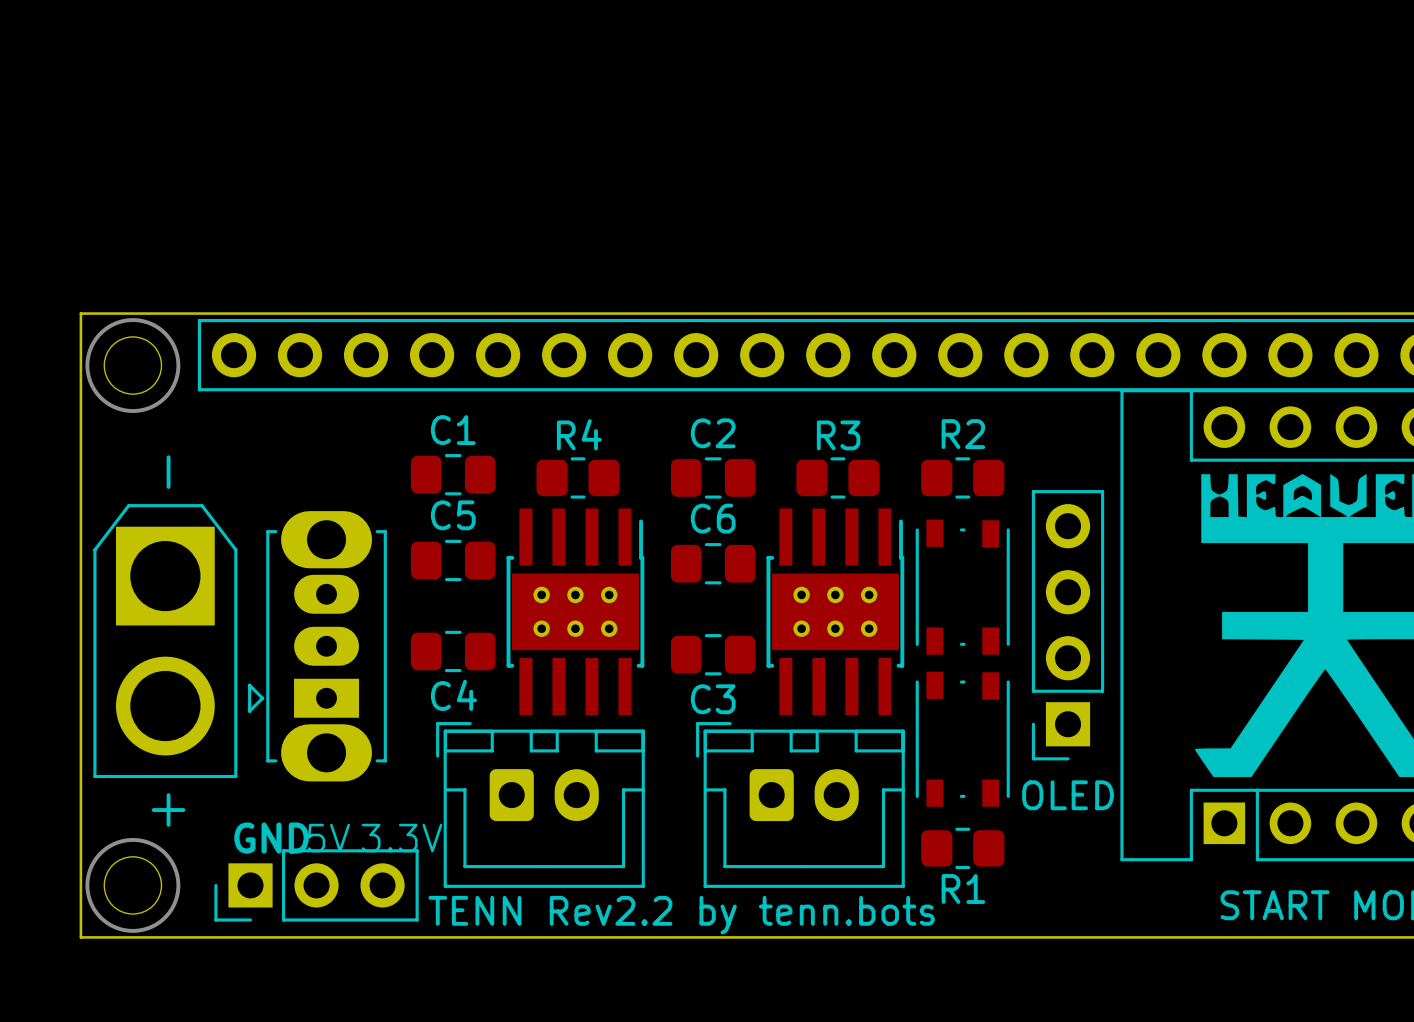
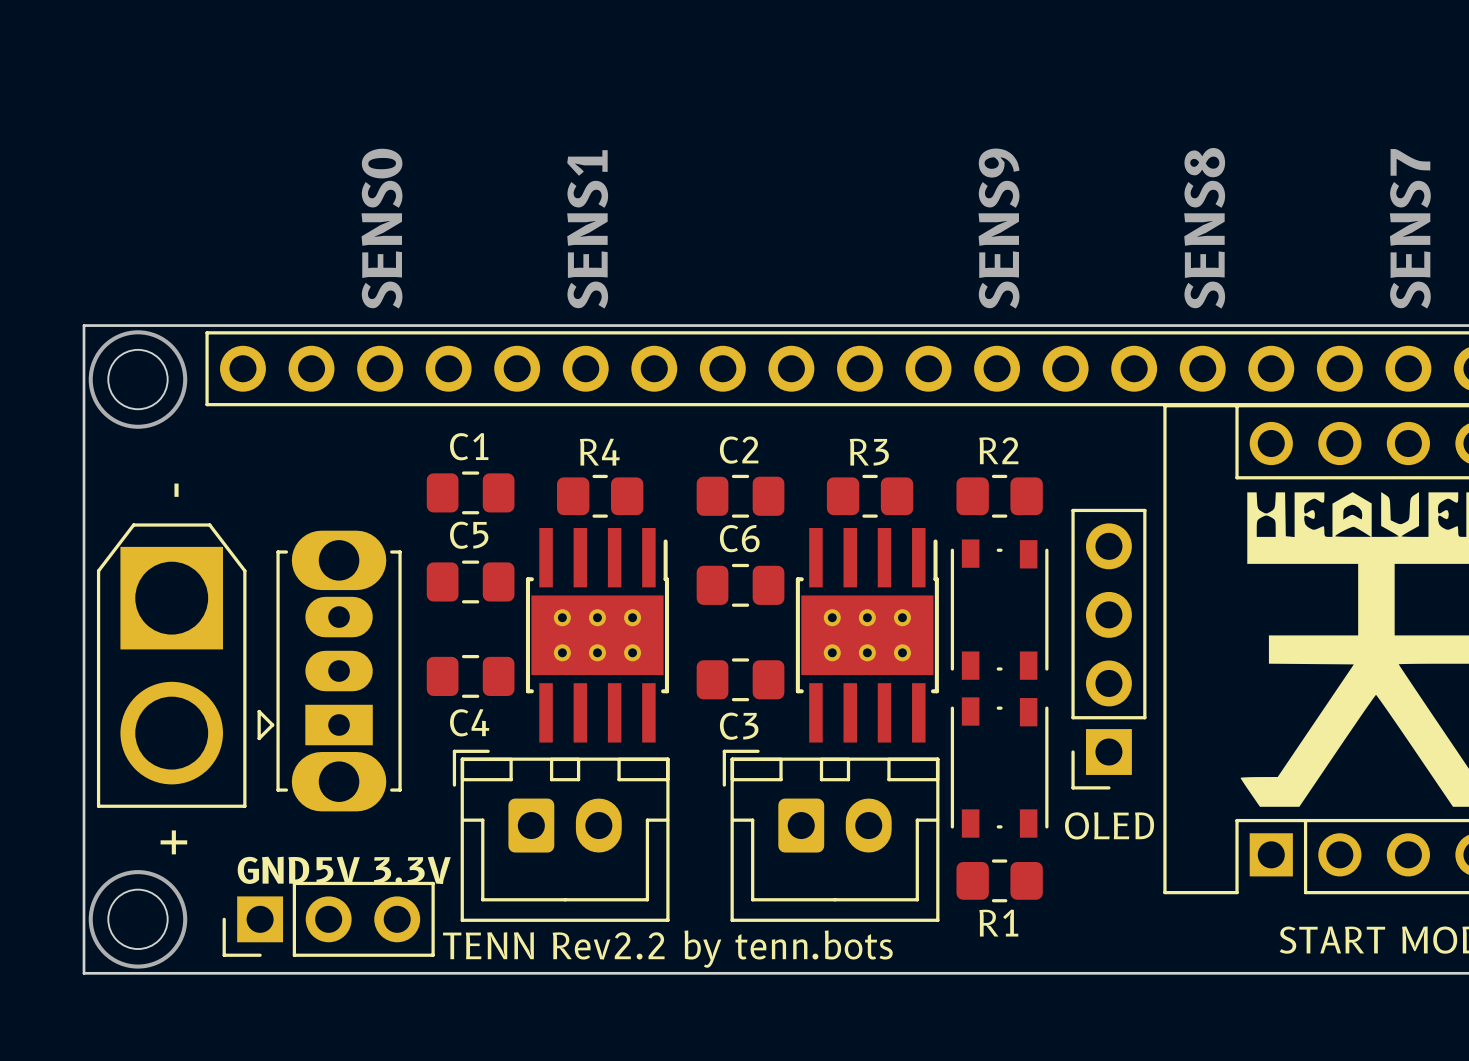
text: none -> SENS7 (1410, 228)
text: none -> SENS0 (381, 228)
text: none -> SENS1 (587, 229)
text: none -> SENS9 (998, 228)
text: none -> SENS8 (1204, 228)

